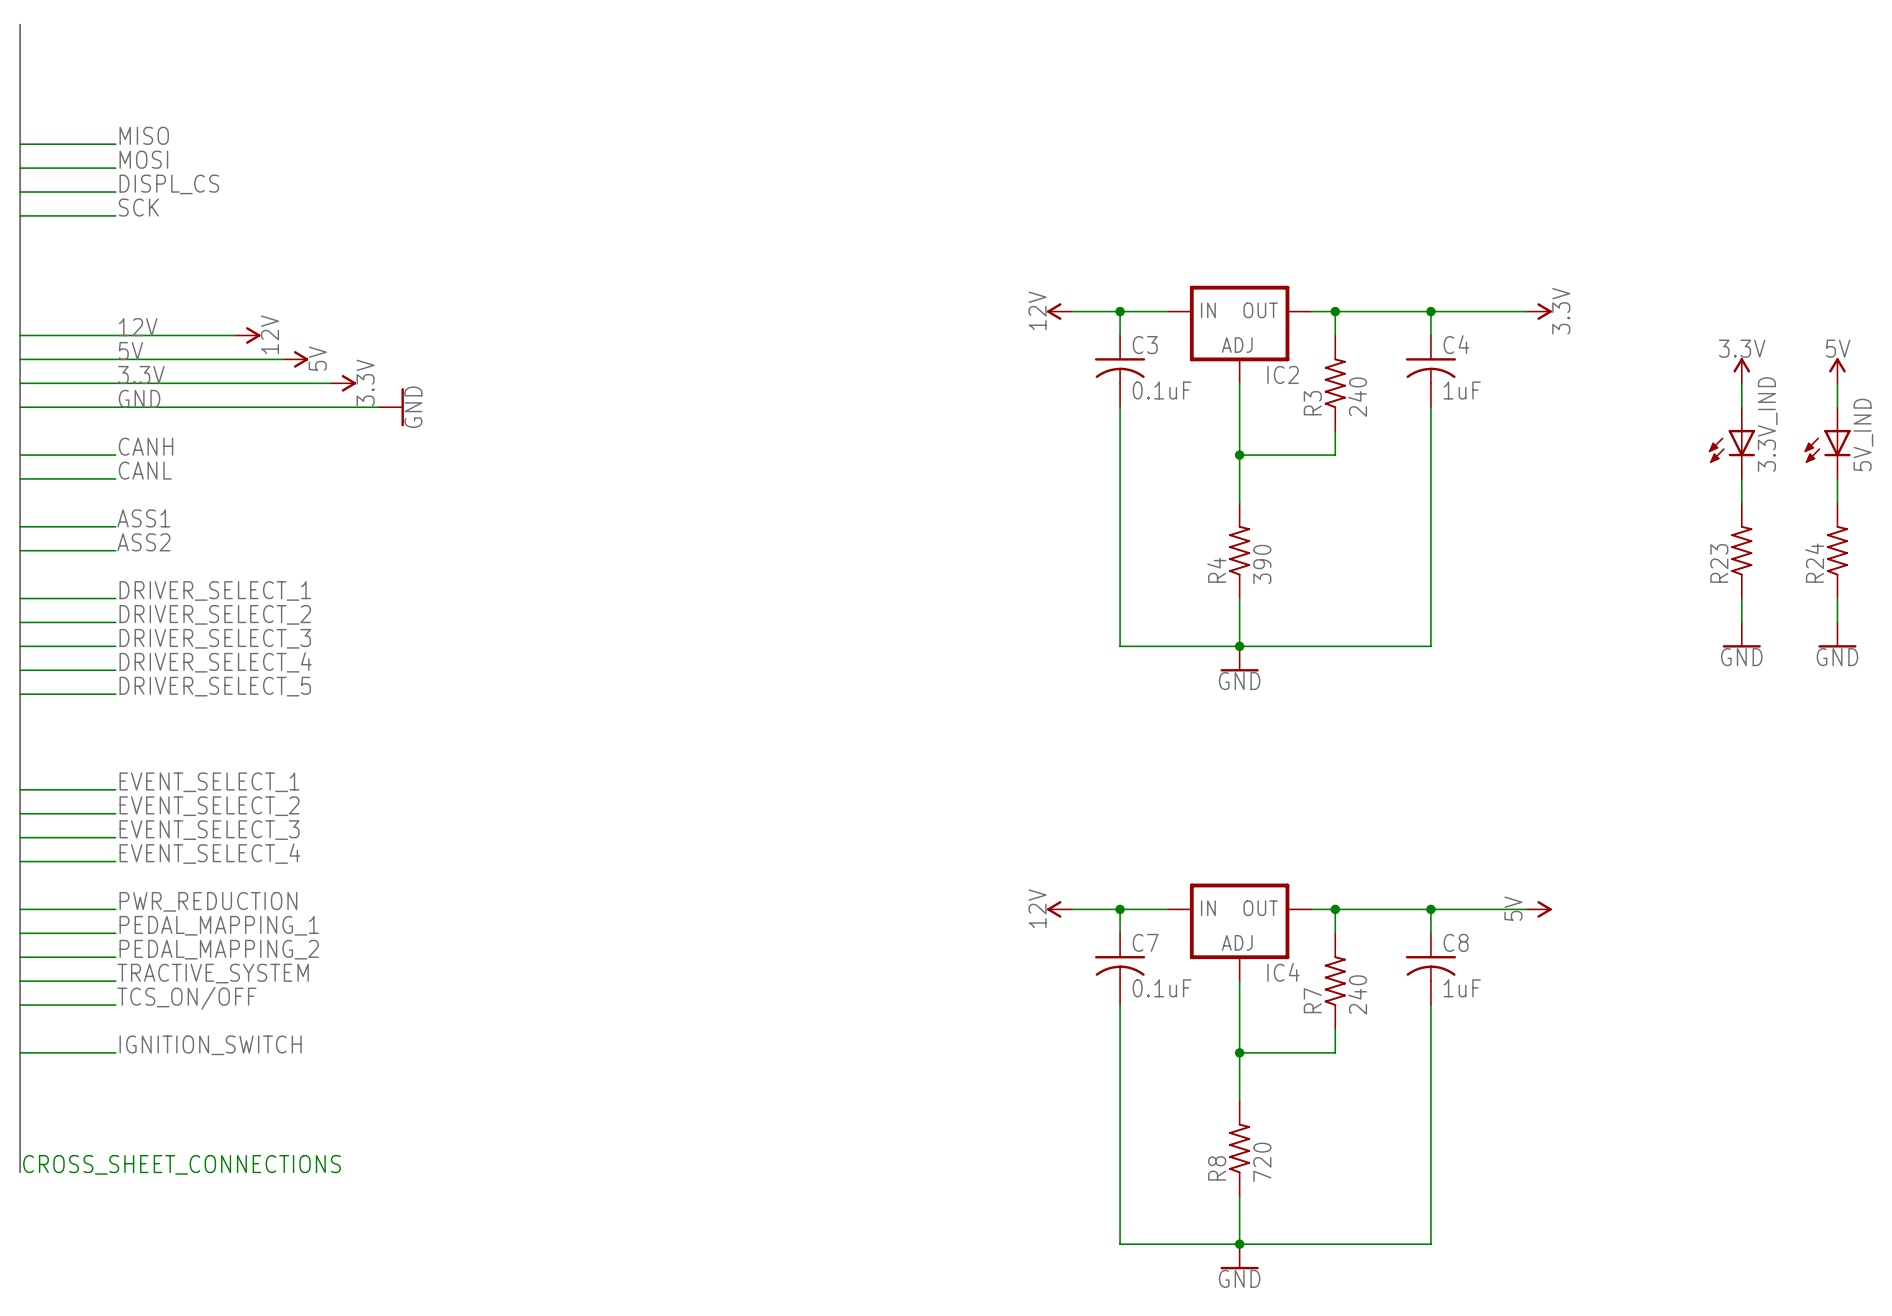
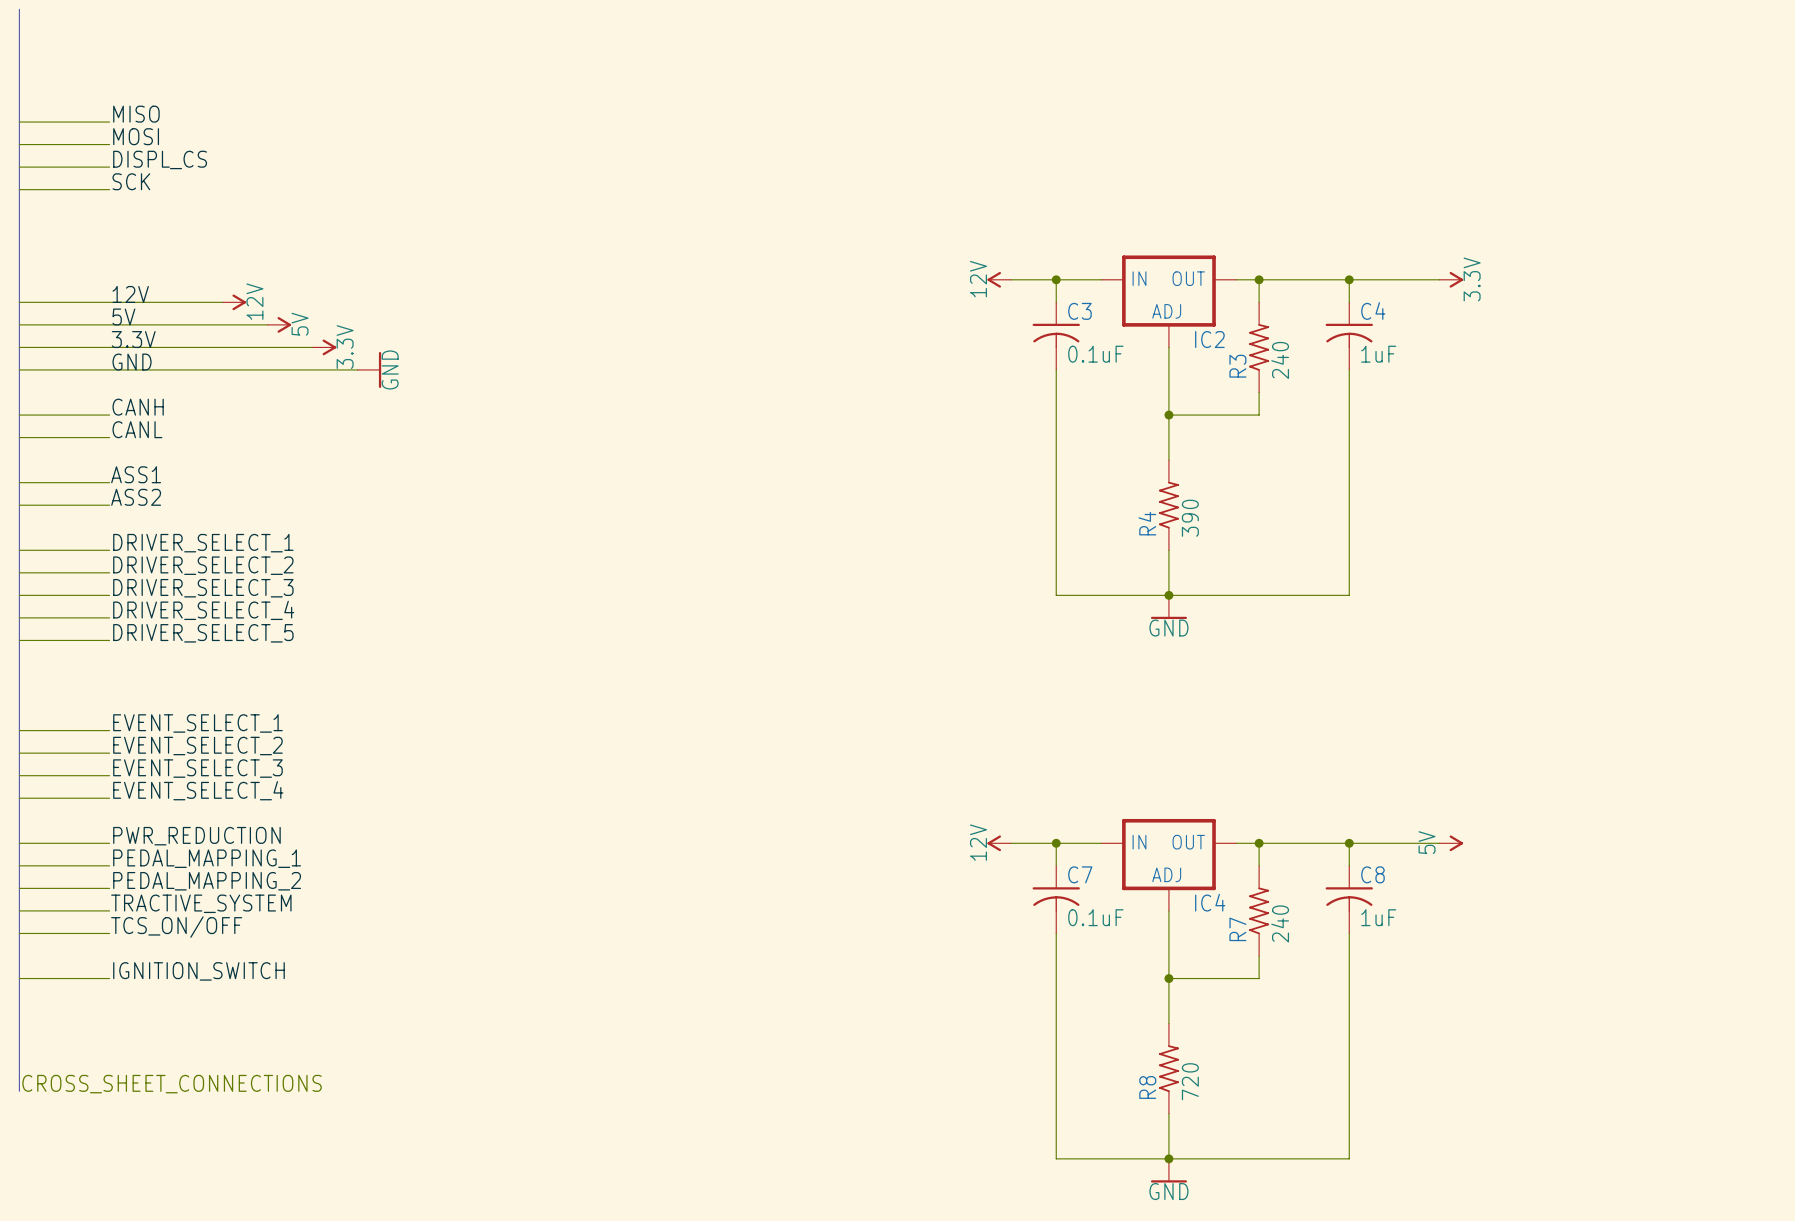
power symbol: 3.3V (1741, 370) -> none
power symbol: 5V (1837, 370) -> none
wire: (1741, 383) (1741, 407) -> none
wire: (1837, 383) (1837, 407) -> none
3.3V_IND: (1731, 443) -> none
5V_IND: (1827, 443) -> none
wire: (1741, 478) (1741, 502) -> none
wire: (1837, 478) (1837, 502) -> none
R23: (1741, 550) -> none
R24: (1837, 550) -> none
wire: (1741, 598) (1741, 622) -> none
wire: (1837, 598) (1837, 622) -> none
power symbol: GND (1741, 635) -> none
power symbol: GND (1837, 635) -> none

